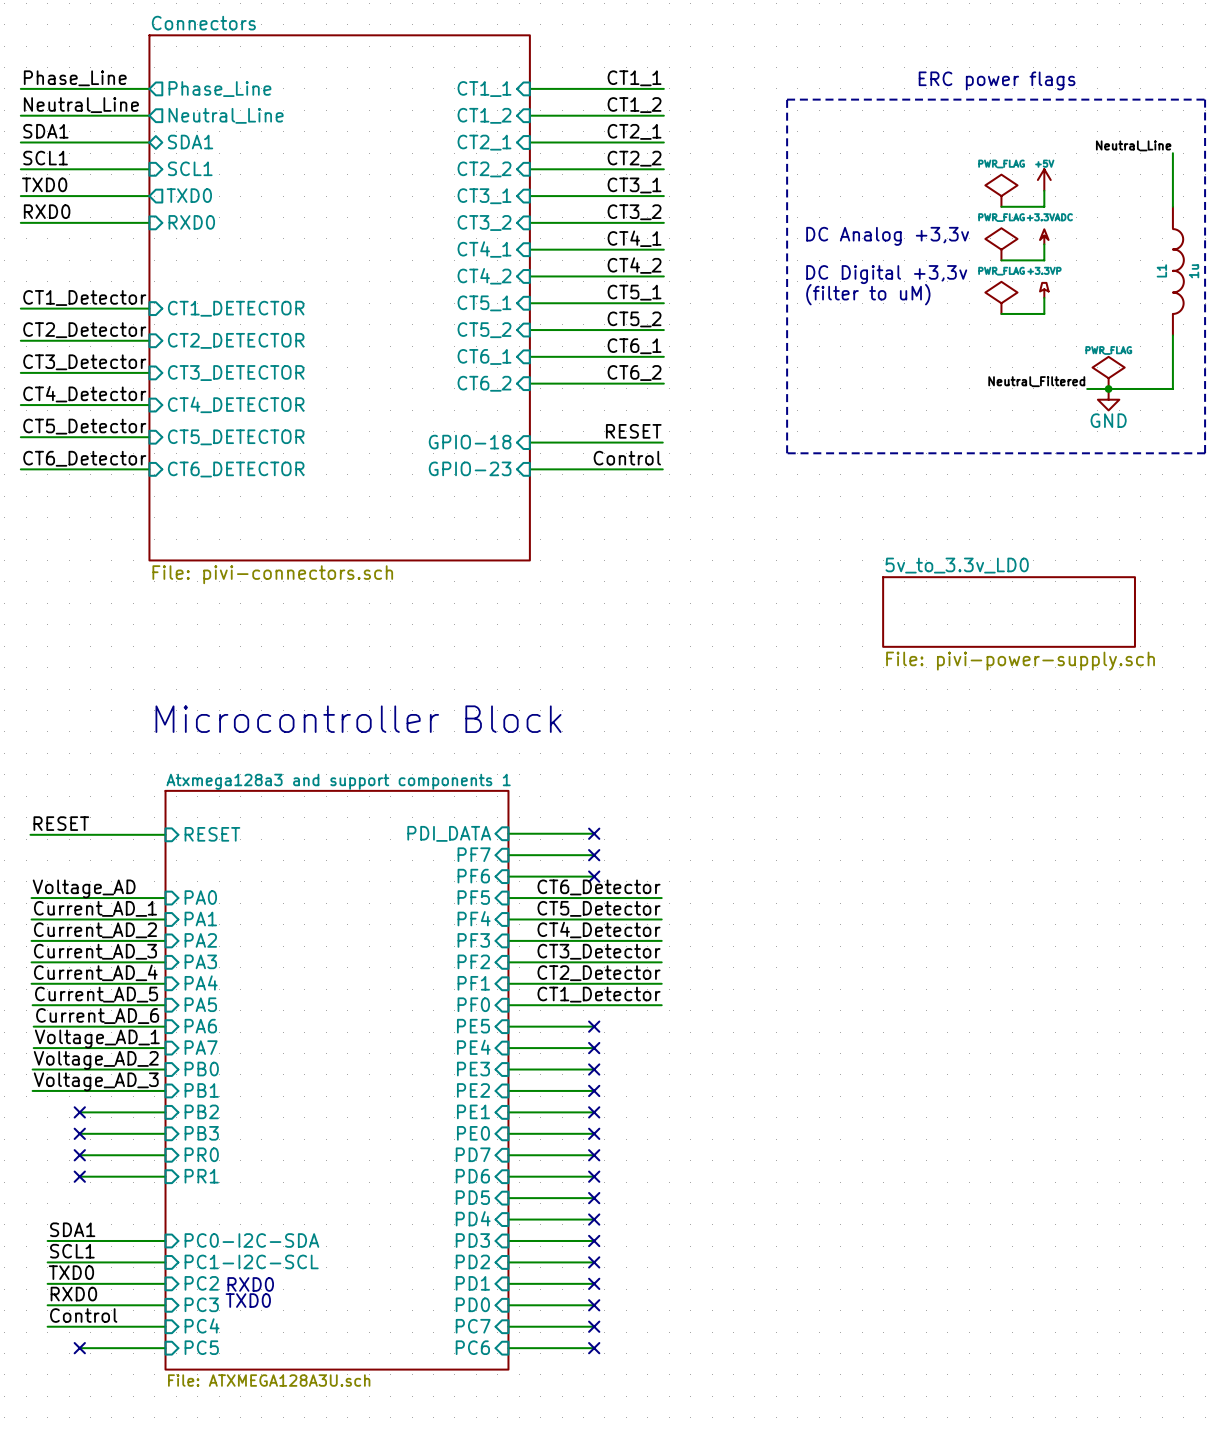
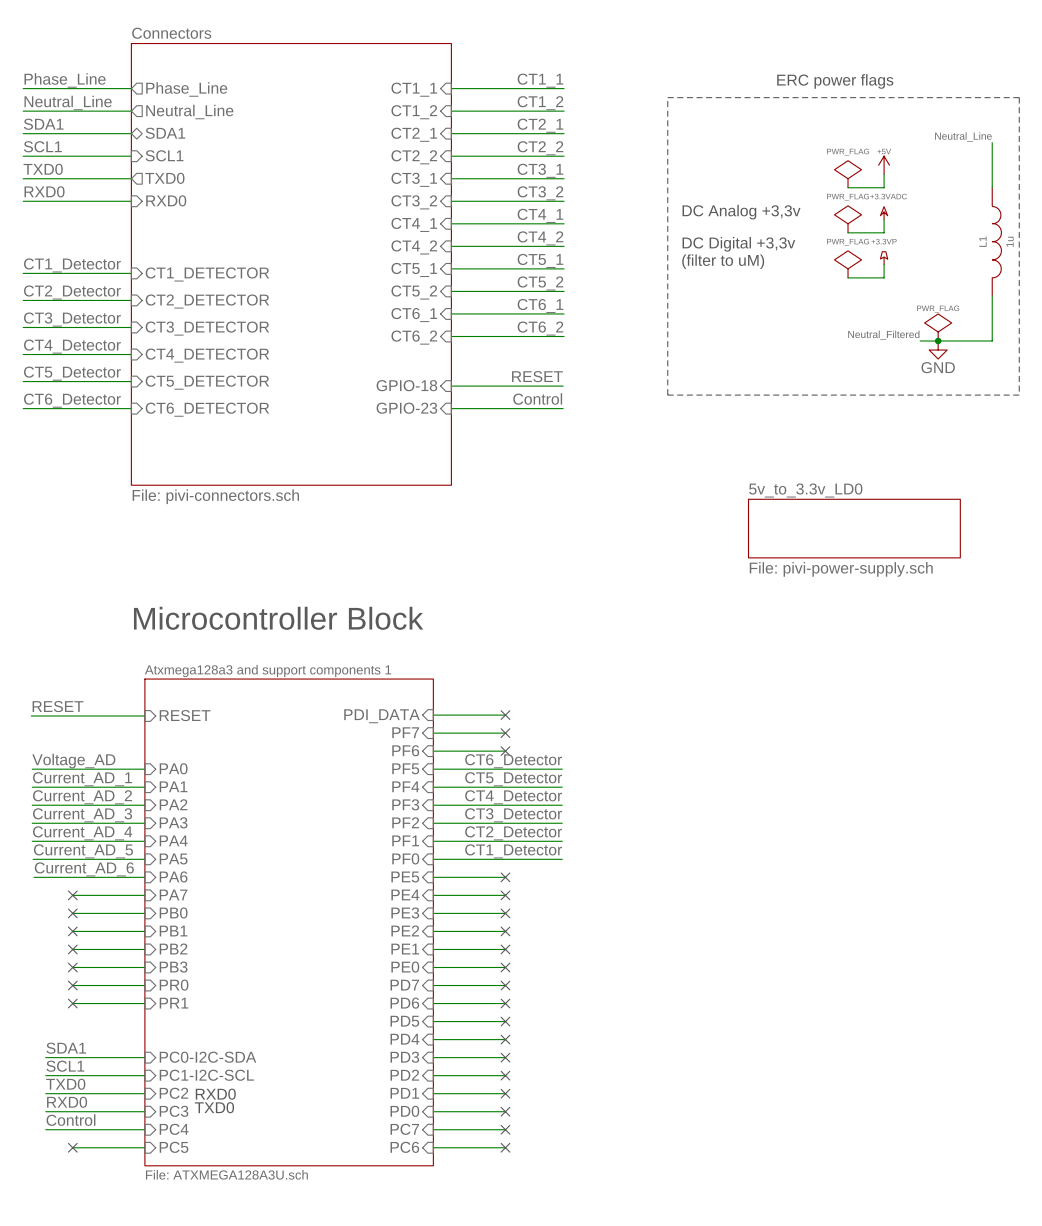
label: Voltage_AD_1 (97, 1039) -> none
wire: (33, 1048) (79, 1048) -> none
no-connect mark: none -> (72, 895)
label: Voltage_AD_2 (96, 1060) -> none
wire: (32, 1069) (79, 1069) -> none
no-connect mark: none -> (72, 913)
label: Voltage_AD_3 (96, 1081) -> none
wire: (32, 1090) (79, 1090) -> none
no-connect mark: none -> (72, 931)

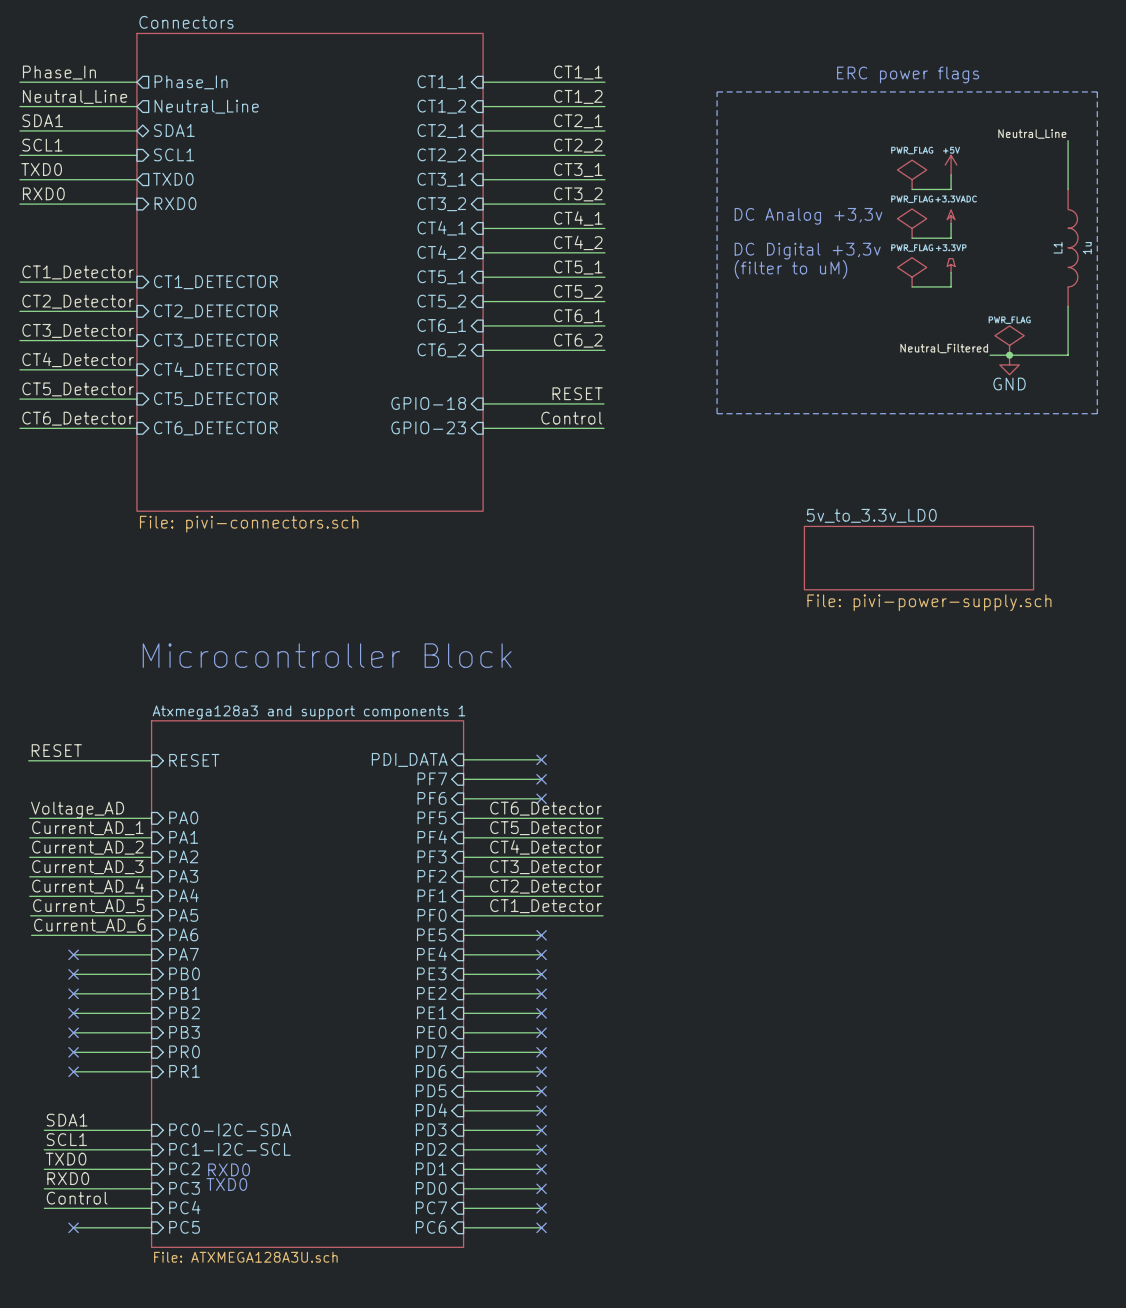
label: Phase_Line (65, 80) -> Phase_In (59, 72)
sheet pin: Phase_Line (186, 89) -> Phase_In (191, 82)

